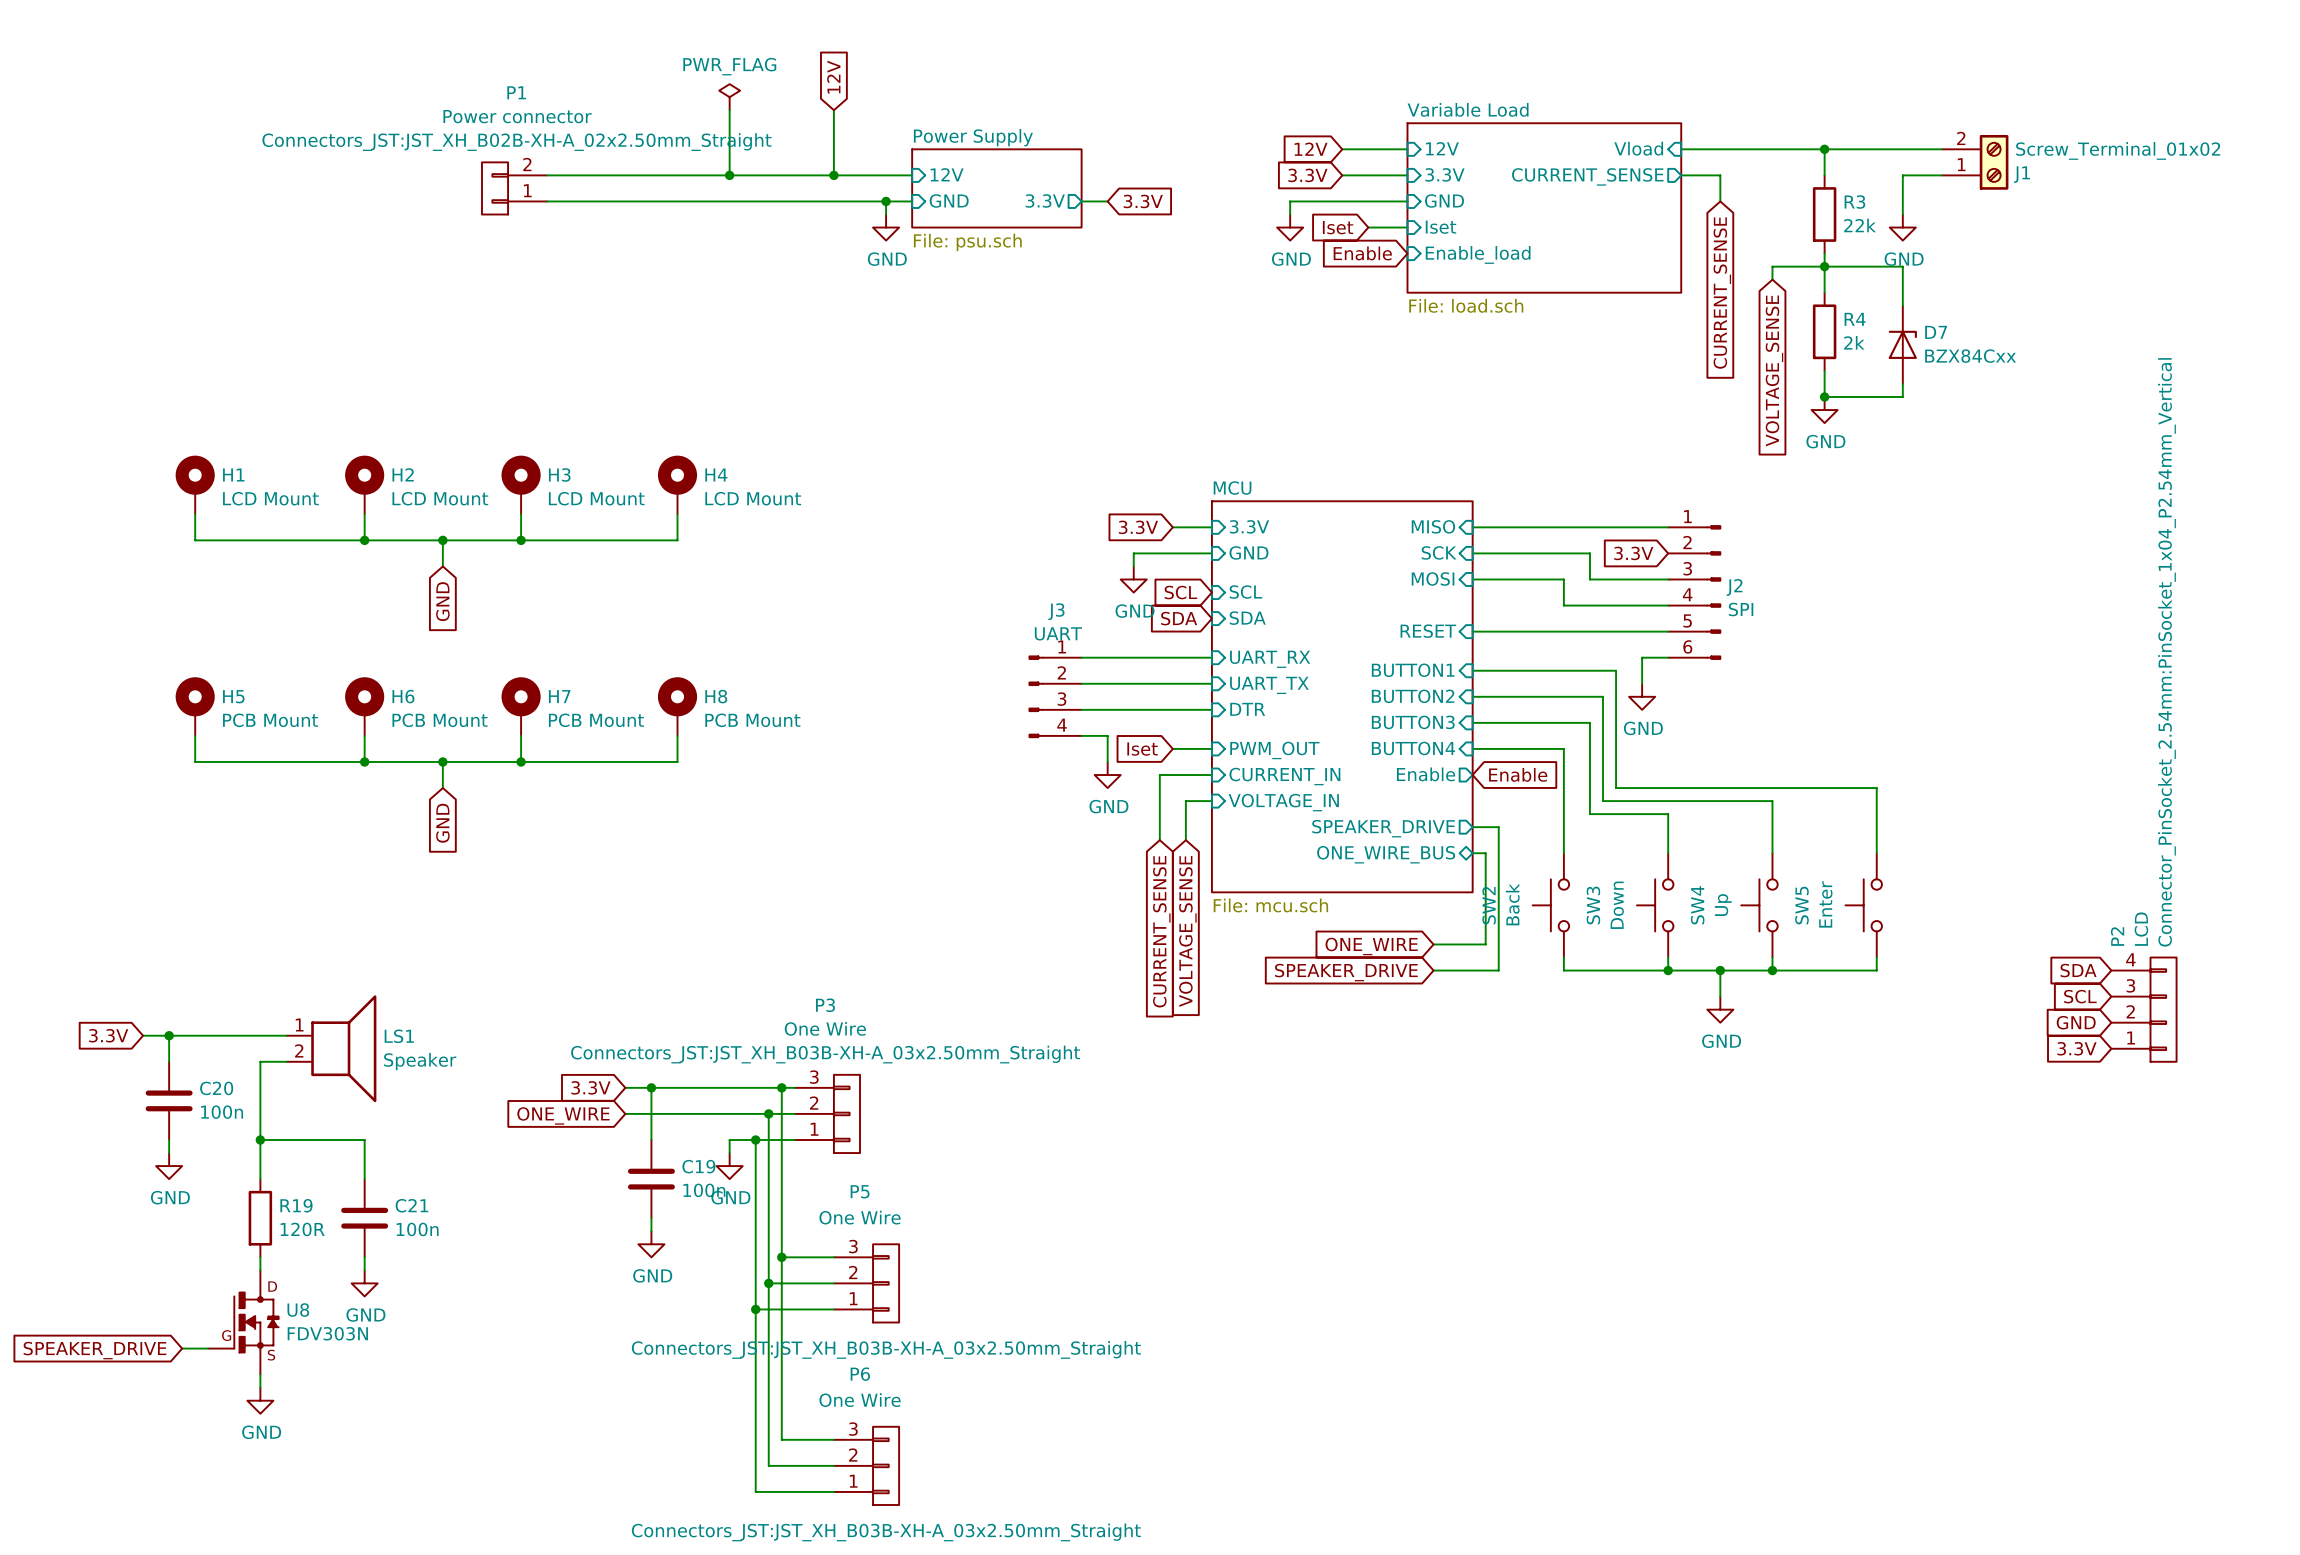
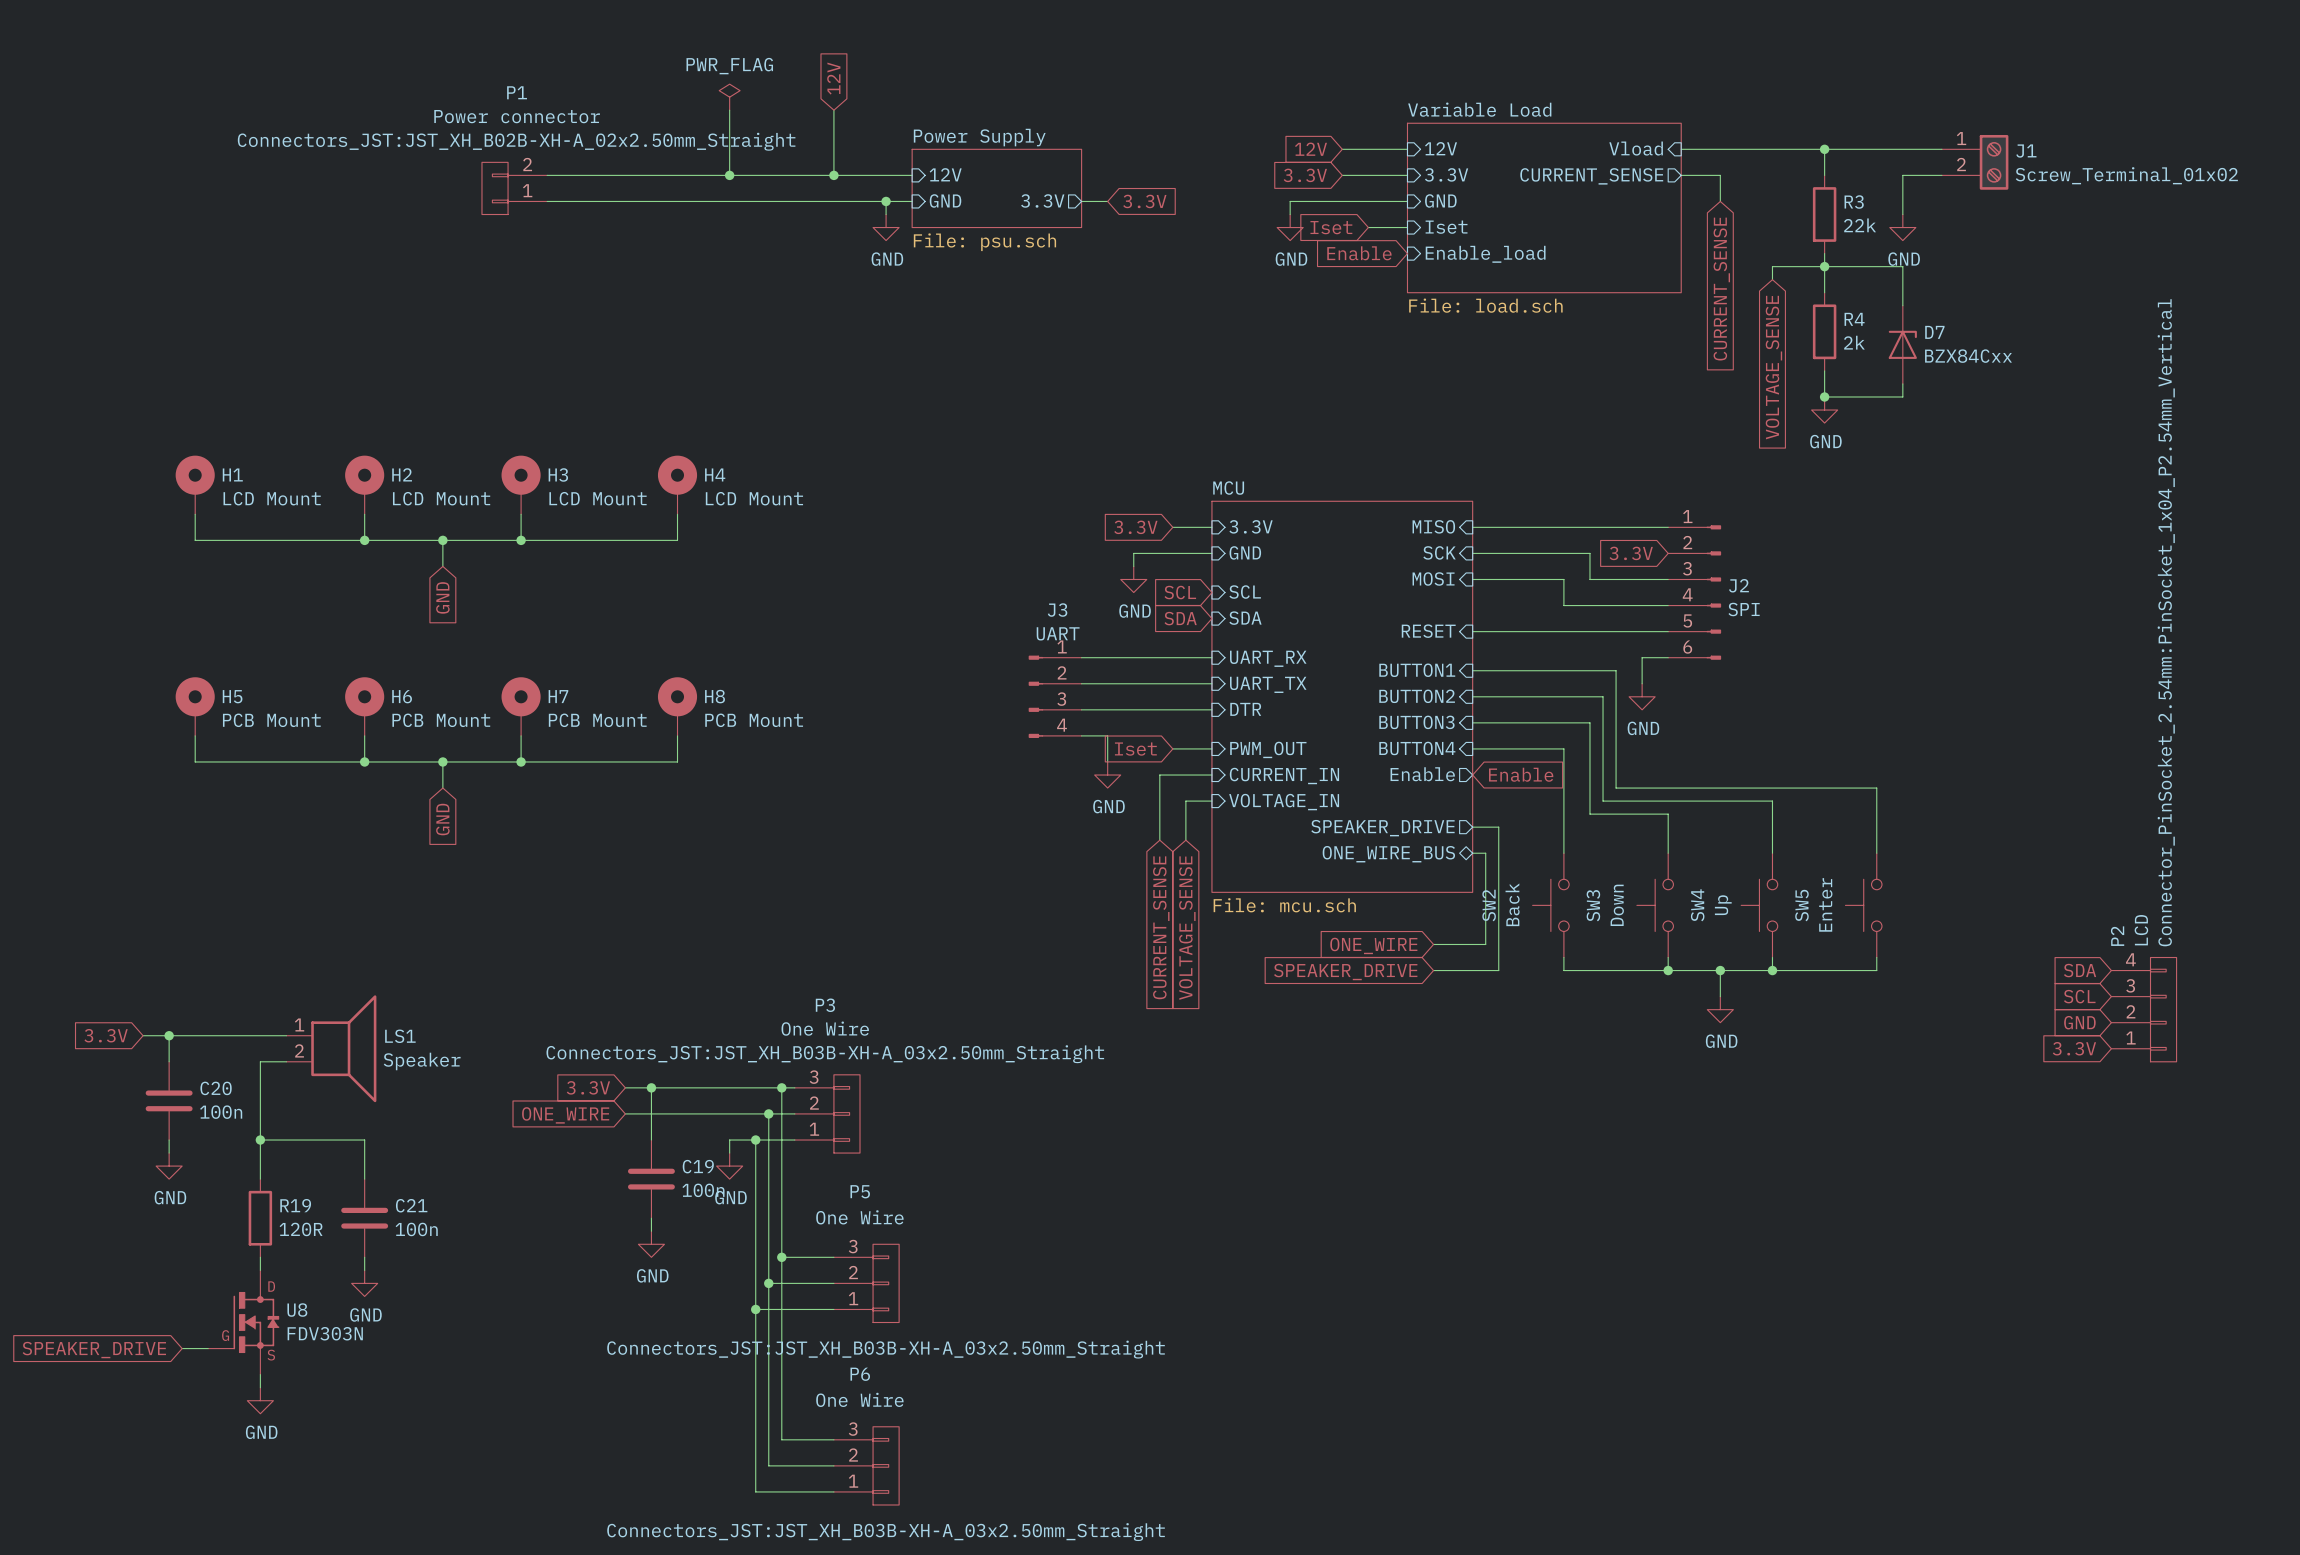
J1 flip: as is (1994, 162) -> up-down (1994, 162)

